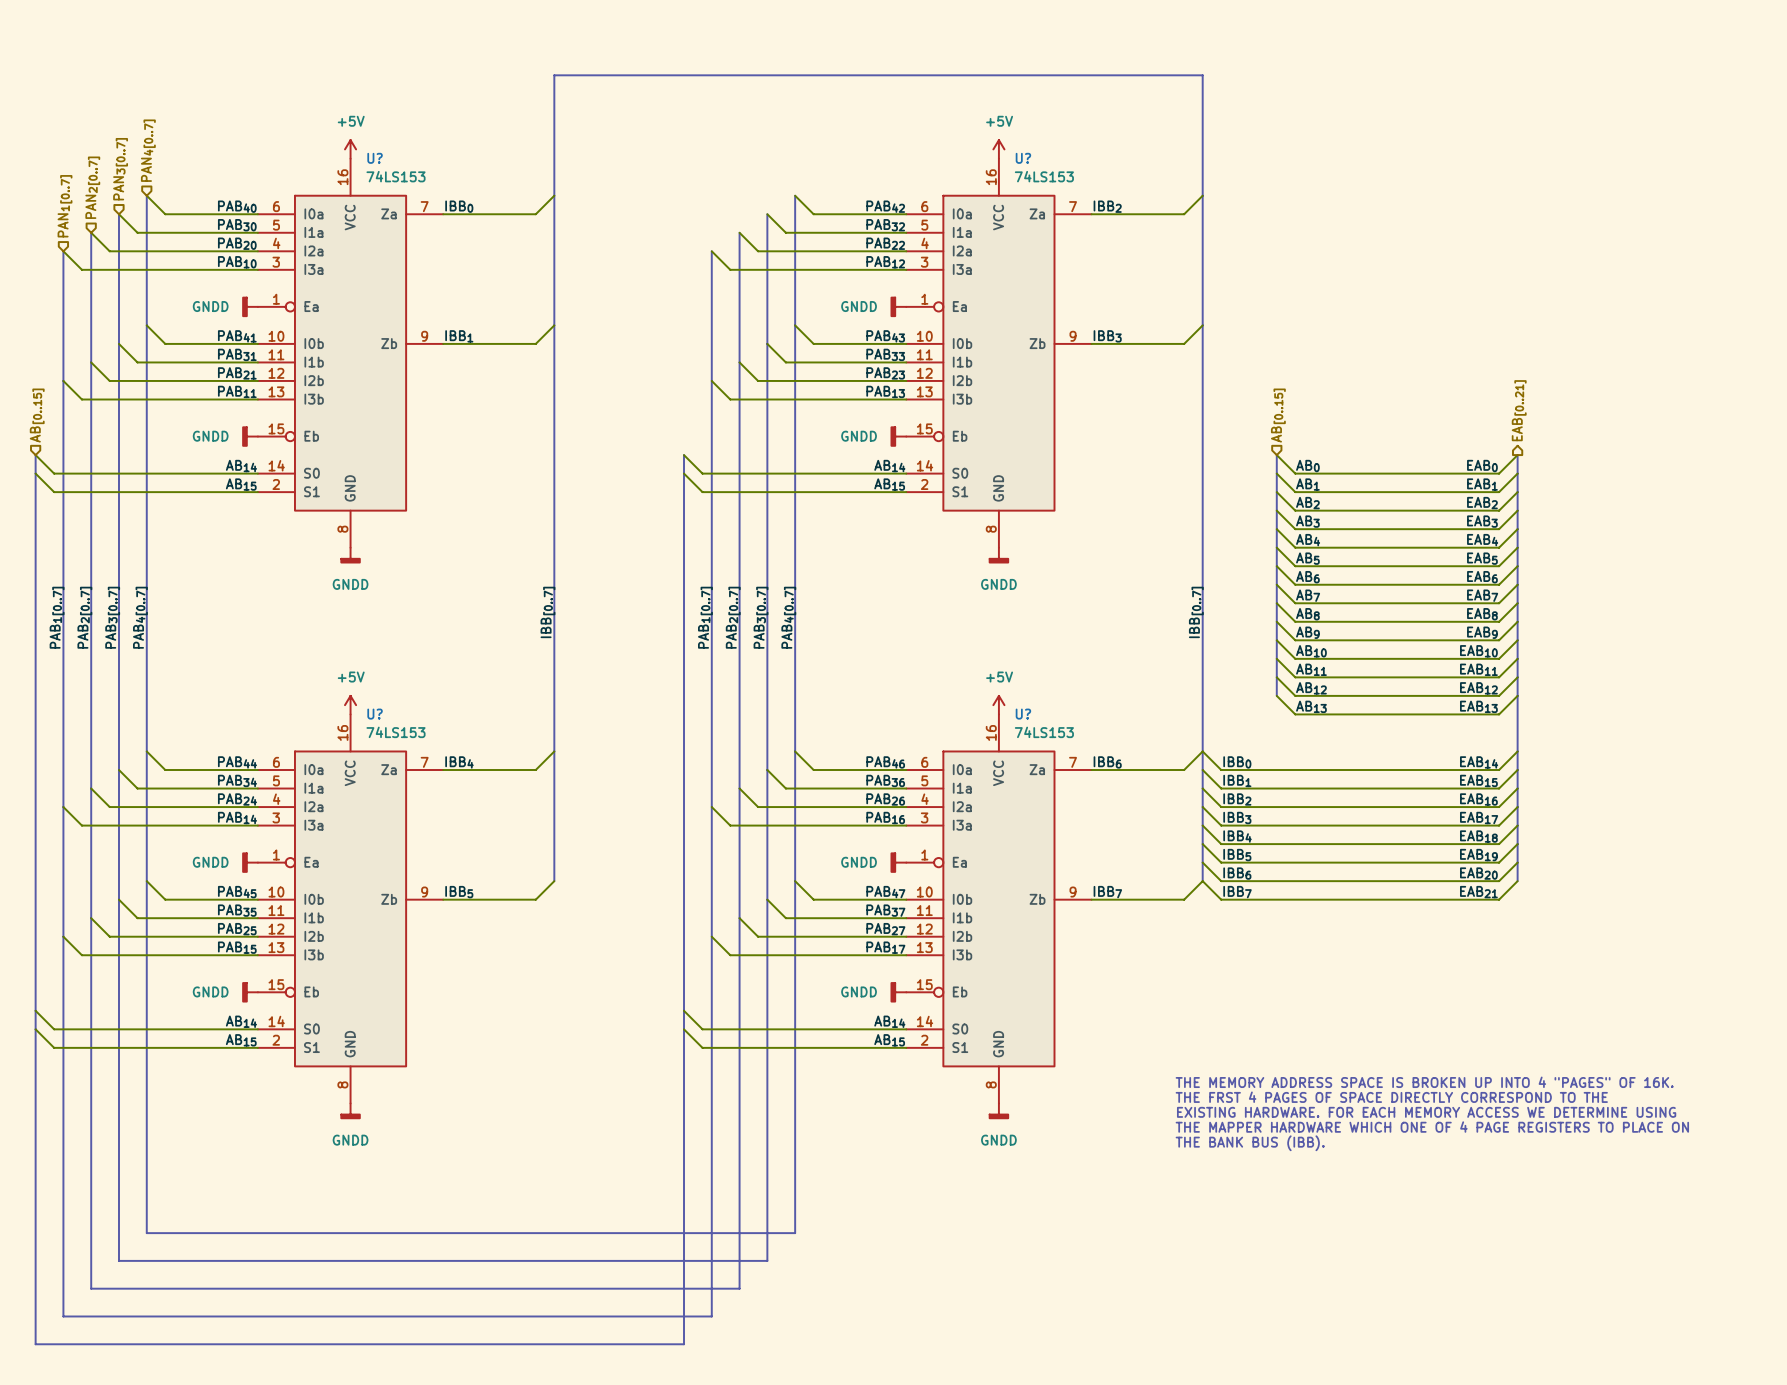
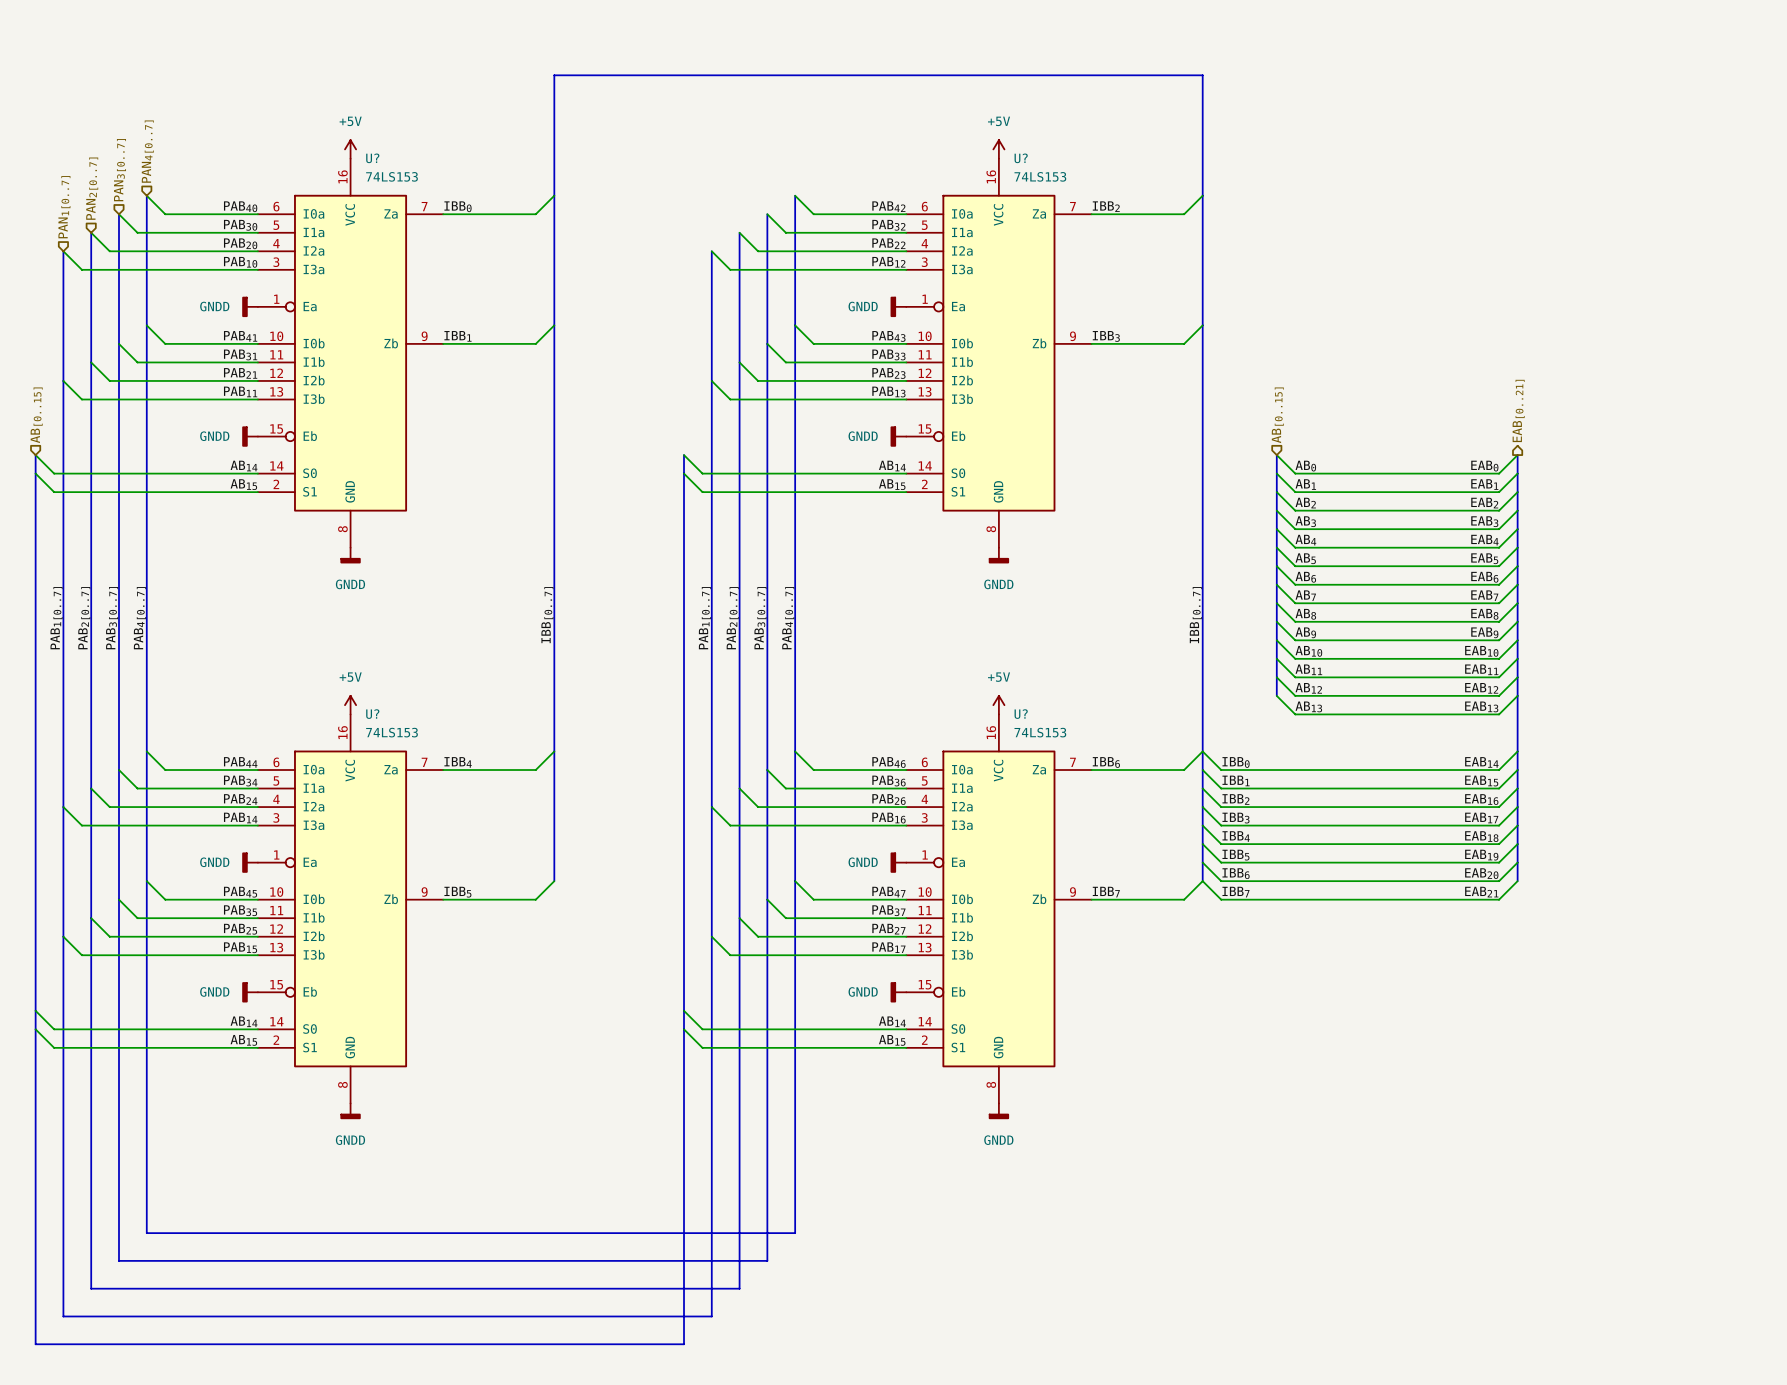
text: THE MEMORY ADDRESS SPACE IS BROKEN UP INTO 4 "PAGES" OF 16K. (1424, 1082) -> none
text: THE FRST 4 PAGES OF SPACE DIRECTLY CORRESPOND TO THE (1391, 1097) -> none
text: EXISTING HARDWARE. FOR EACH MEMORY ACCESS WE DETERMINE USING (1426, 1112) -> none
text: THE MAPPER HARDWARE WHICH ONE OF 4 PAGE REGISTERS TO PLACE ON (1432, 1127) -> none
text: THE BANK BUS (IBB). (1250, 1143) -> none

